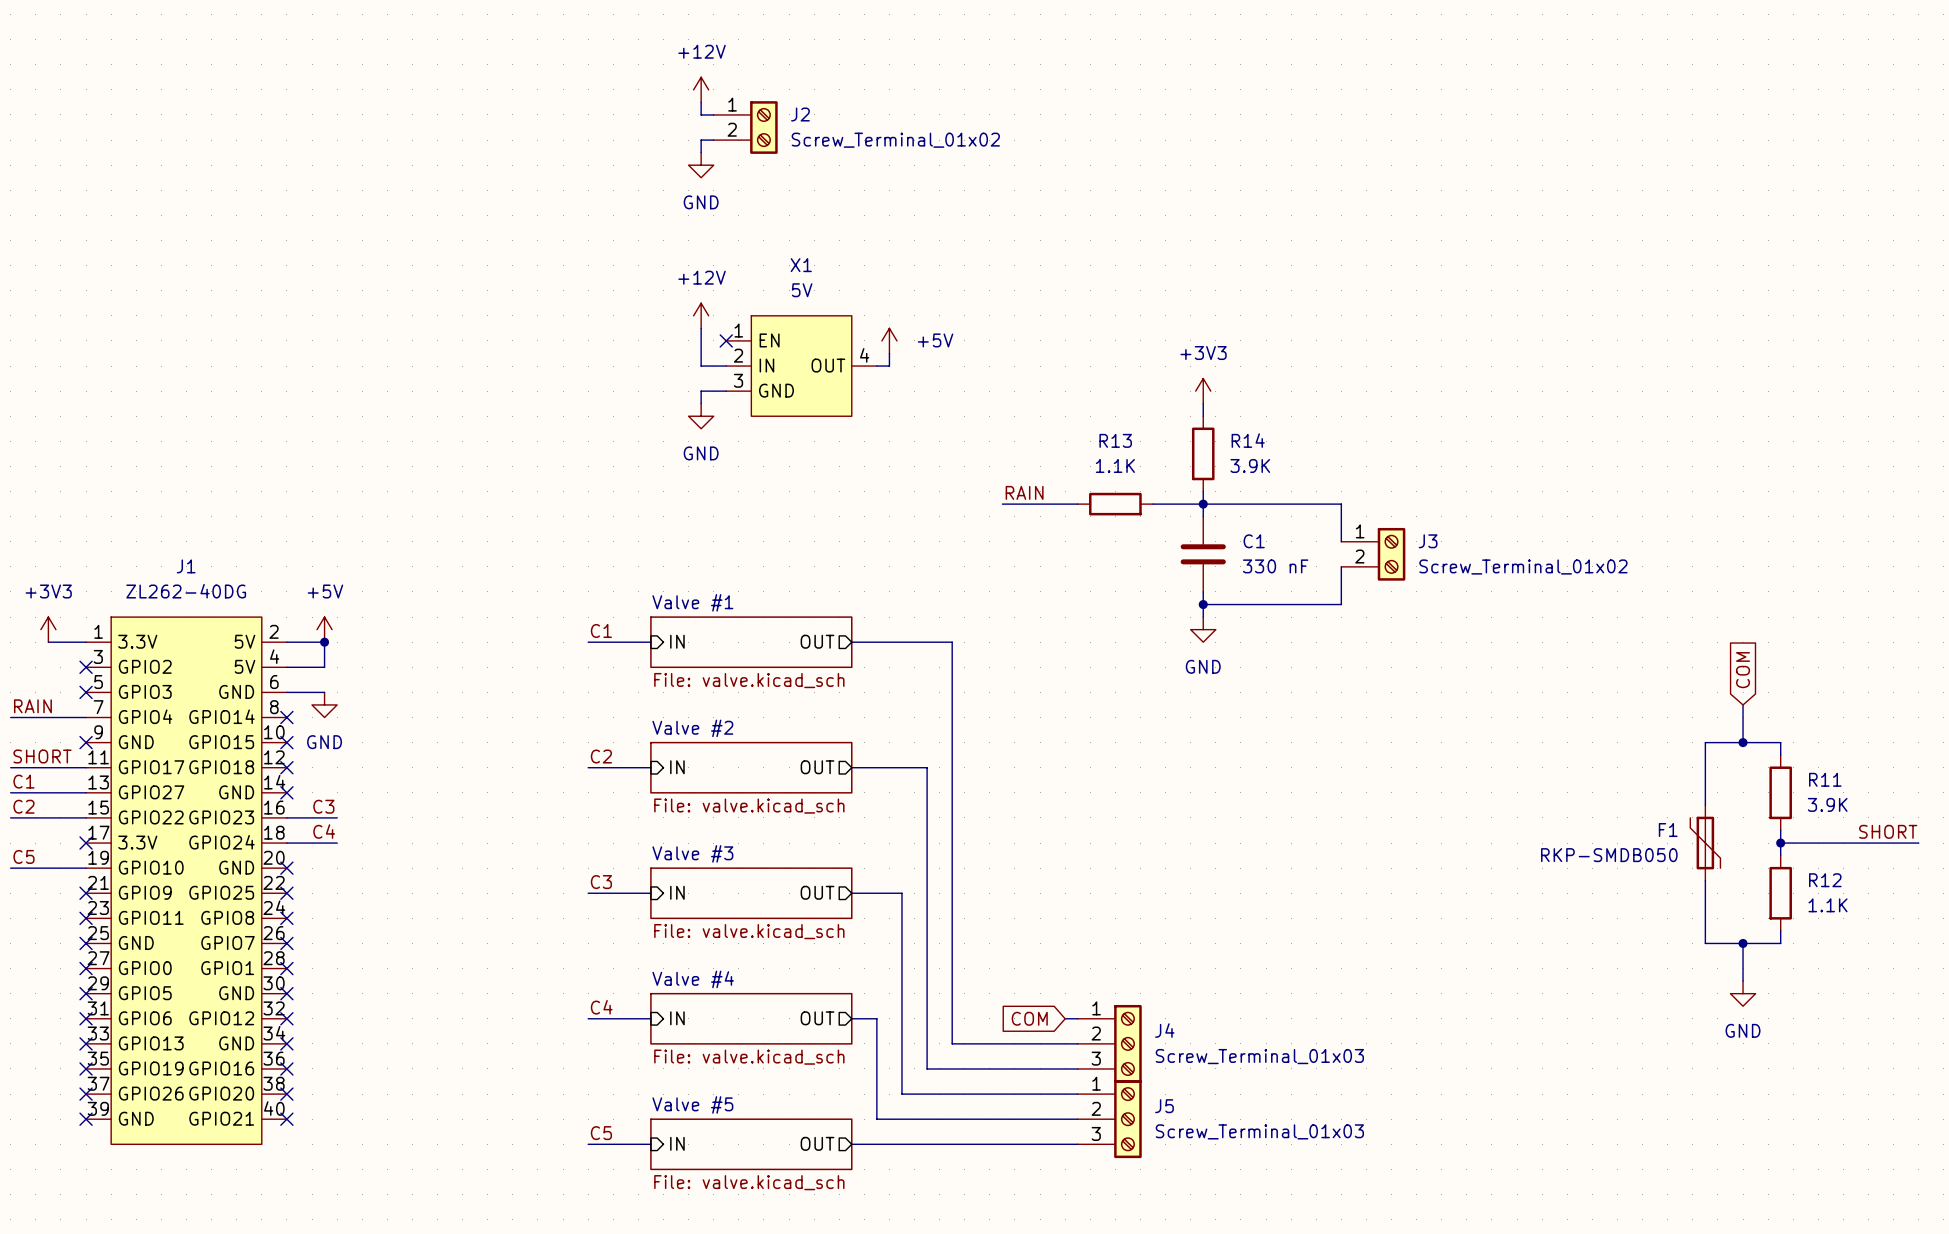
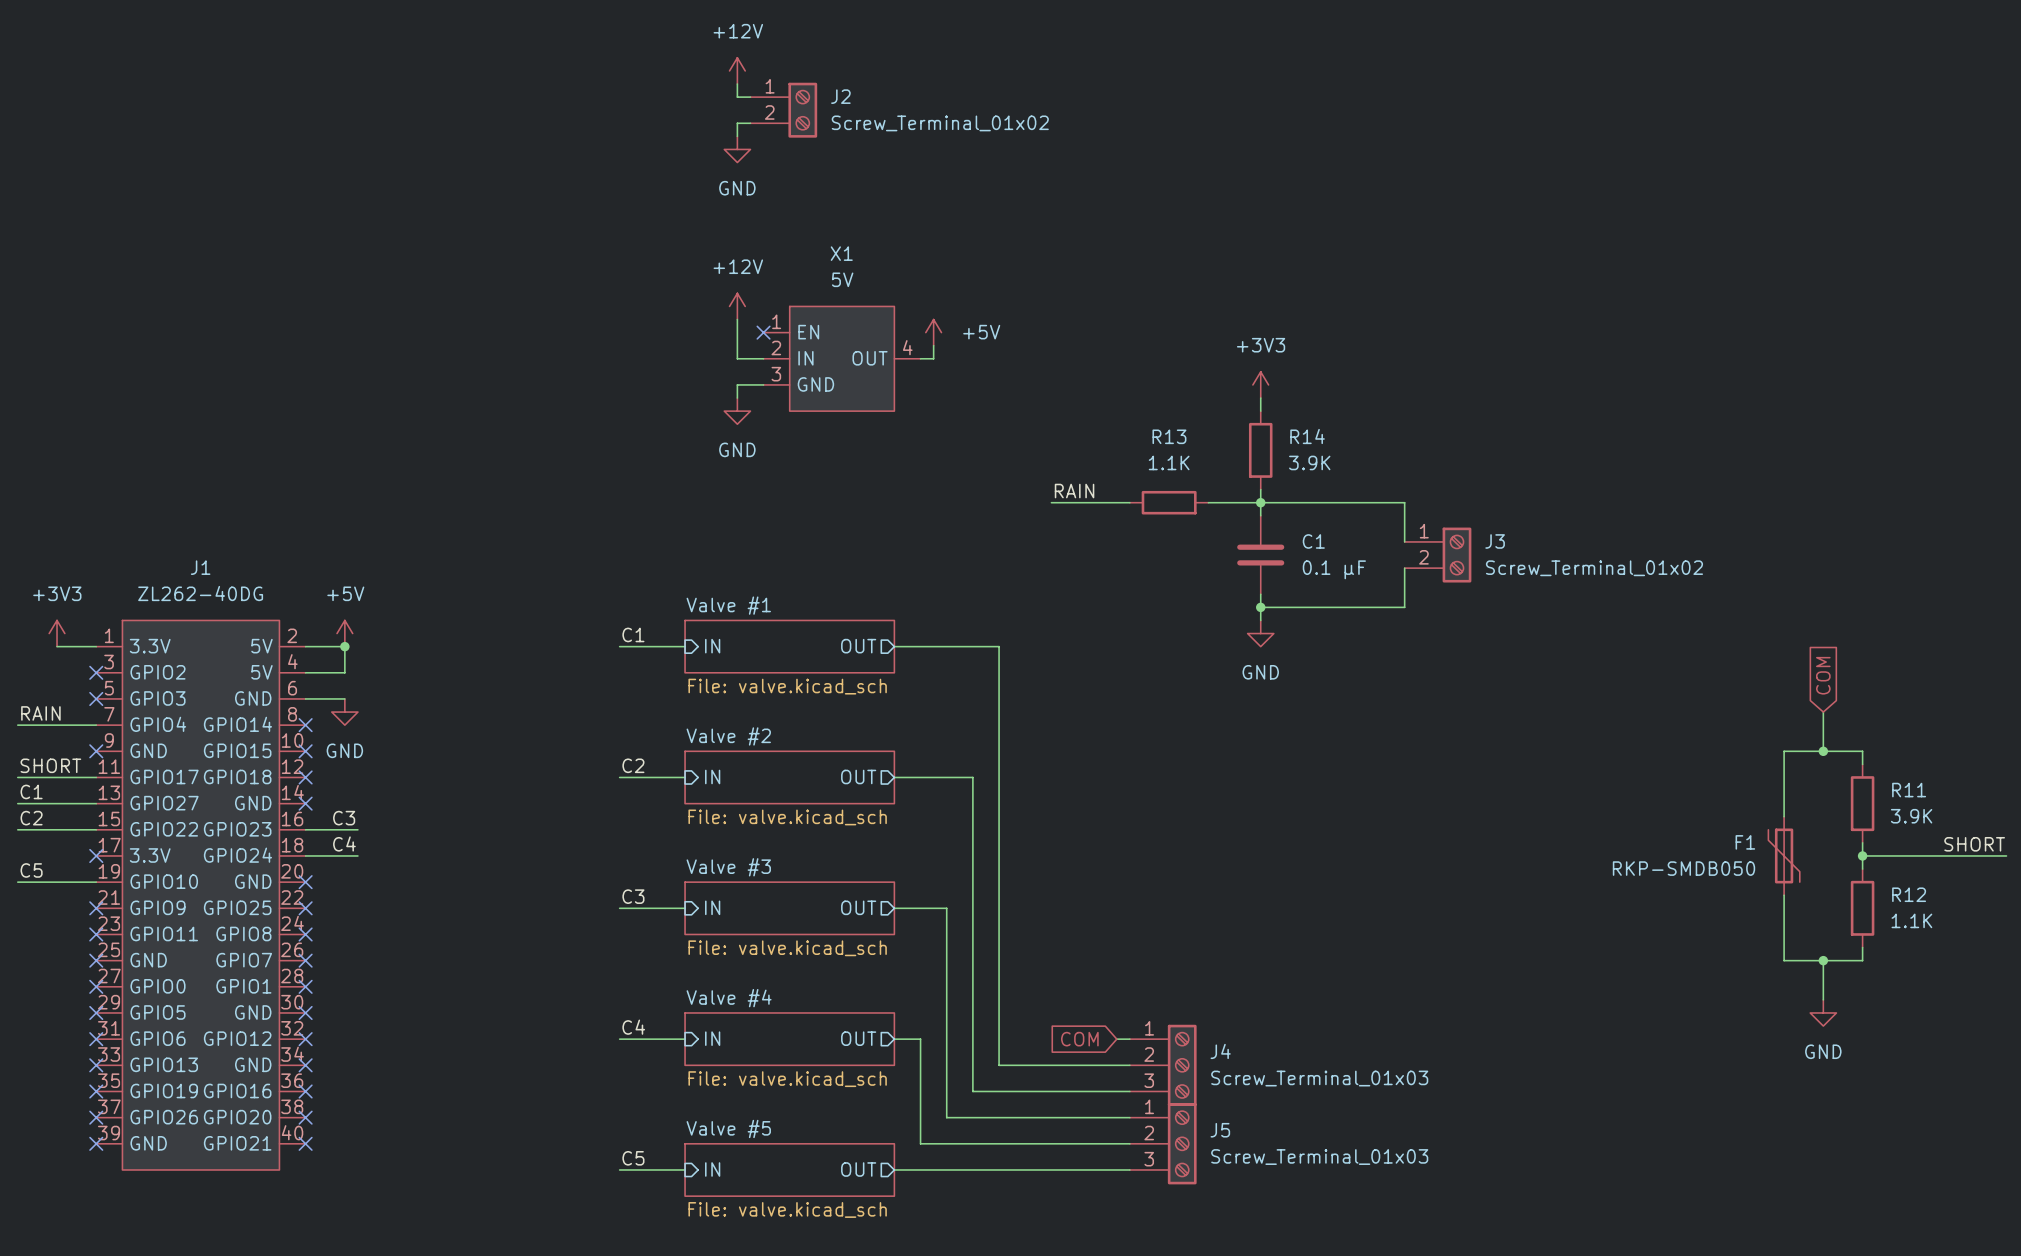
C1 value: 330 nF (1275, 566) -> 0.1 µF (1334, 569)

